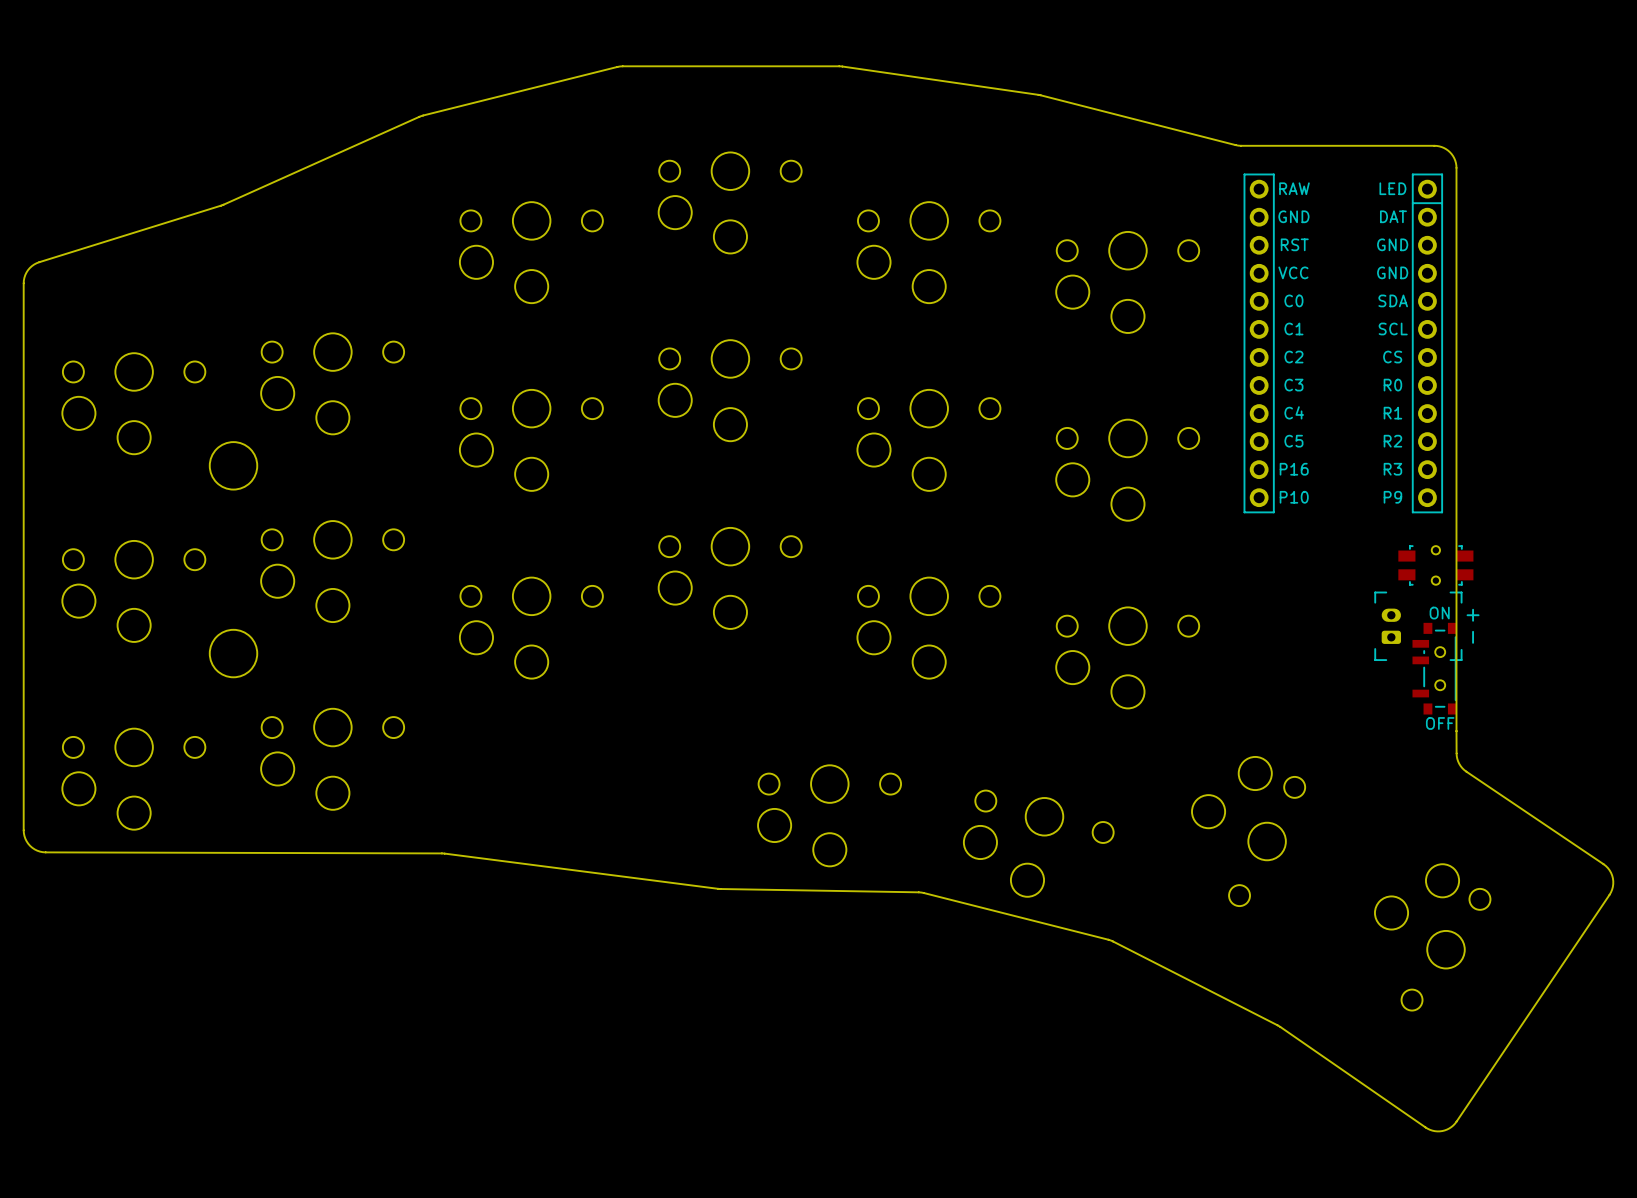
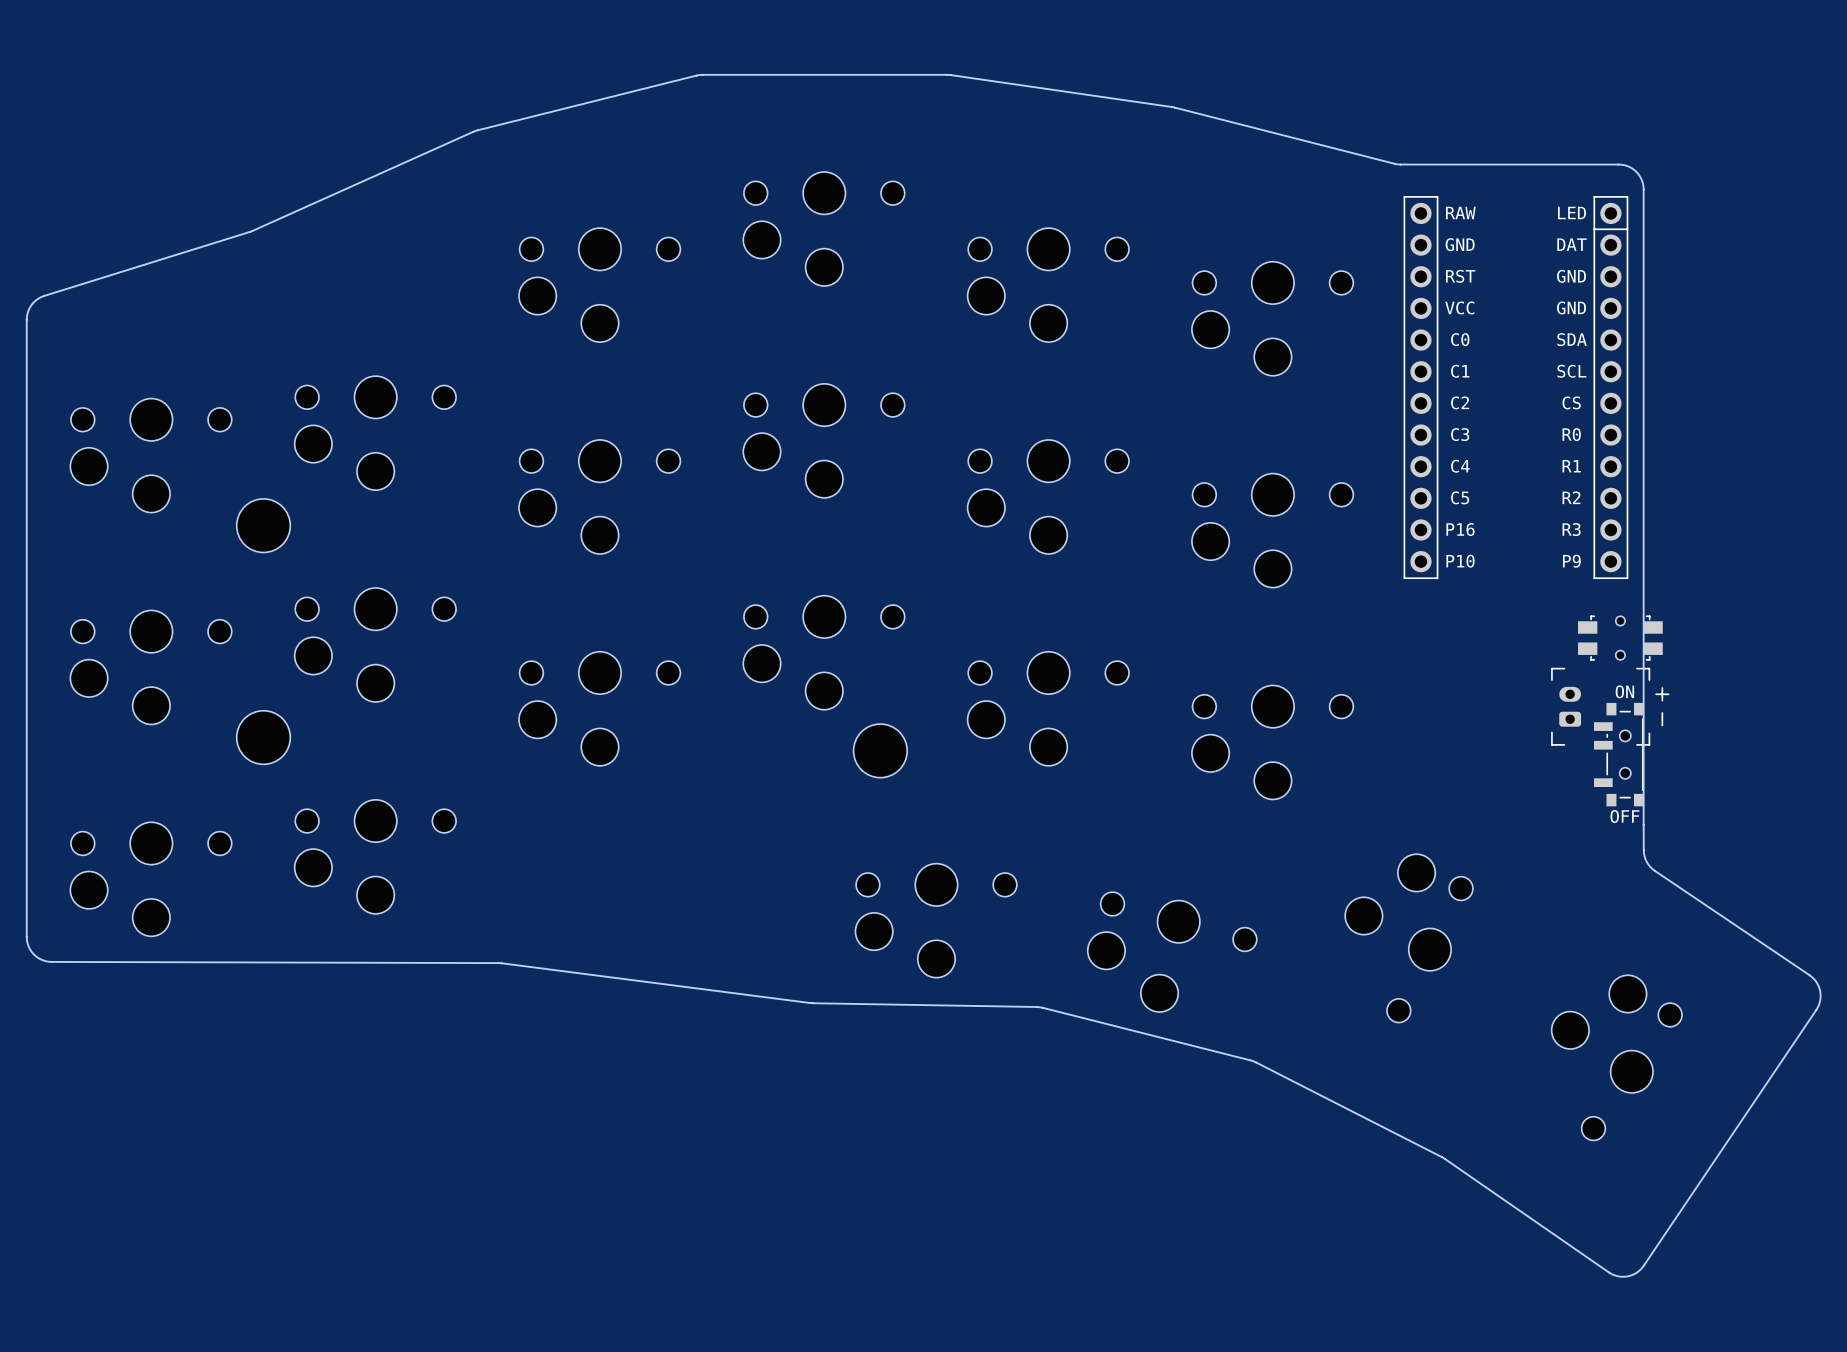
part: none -> (880, 750)

